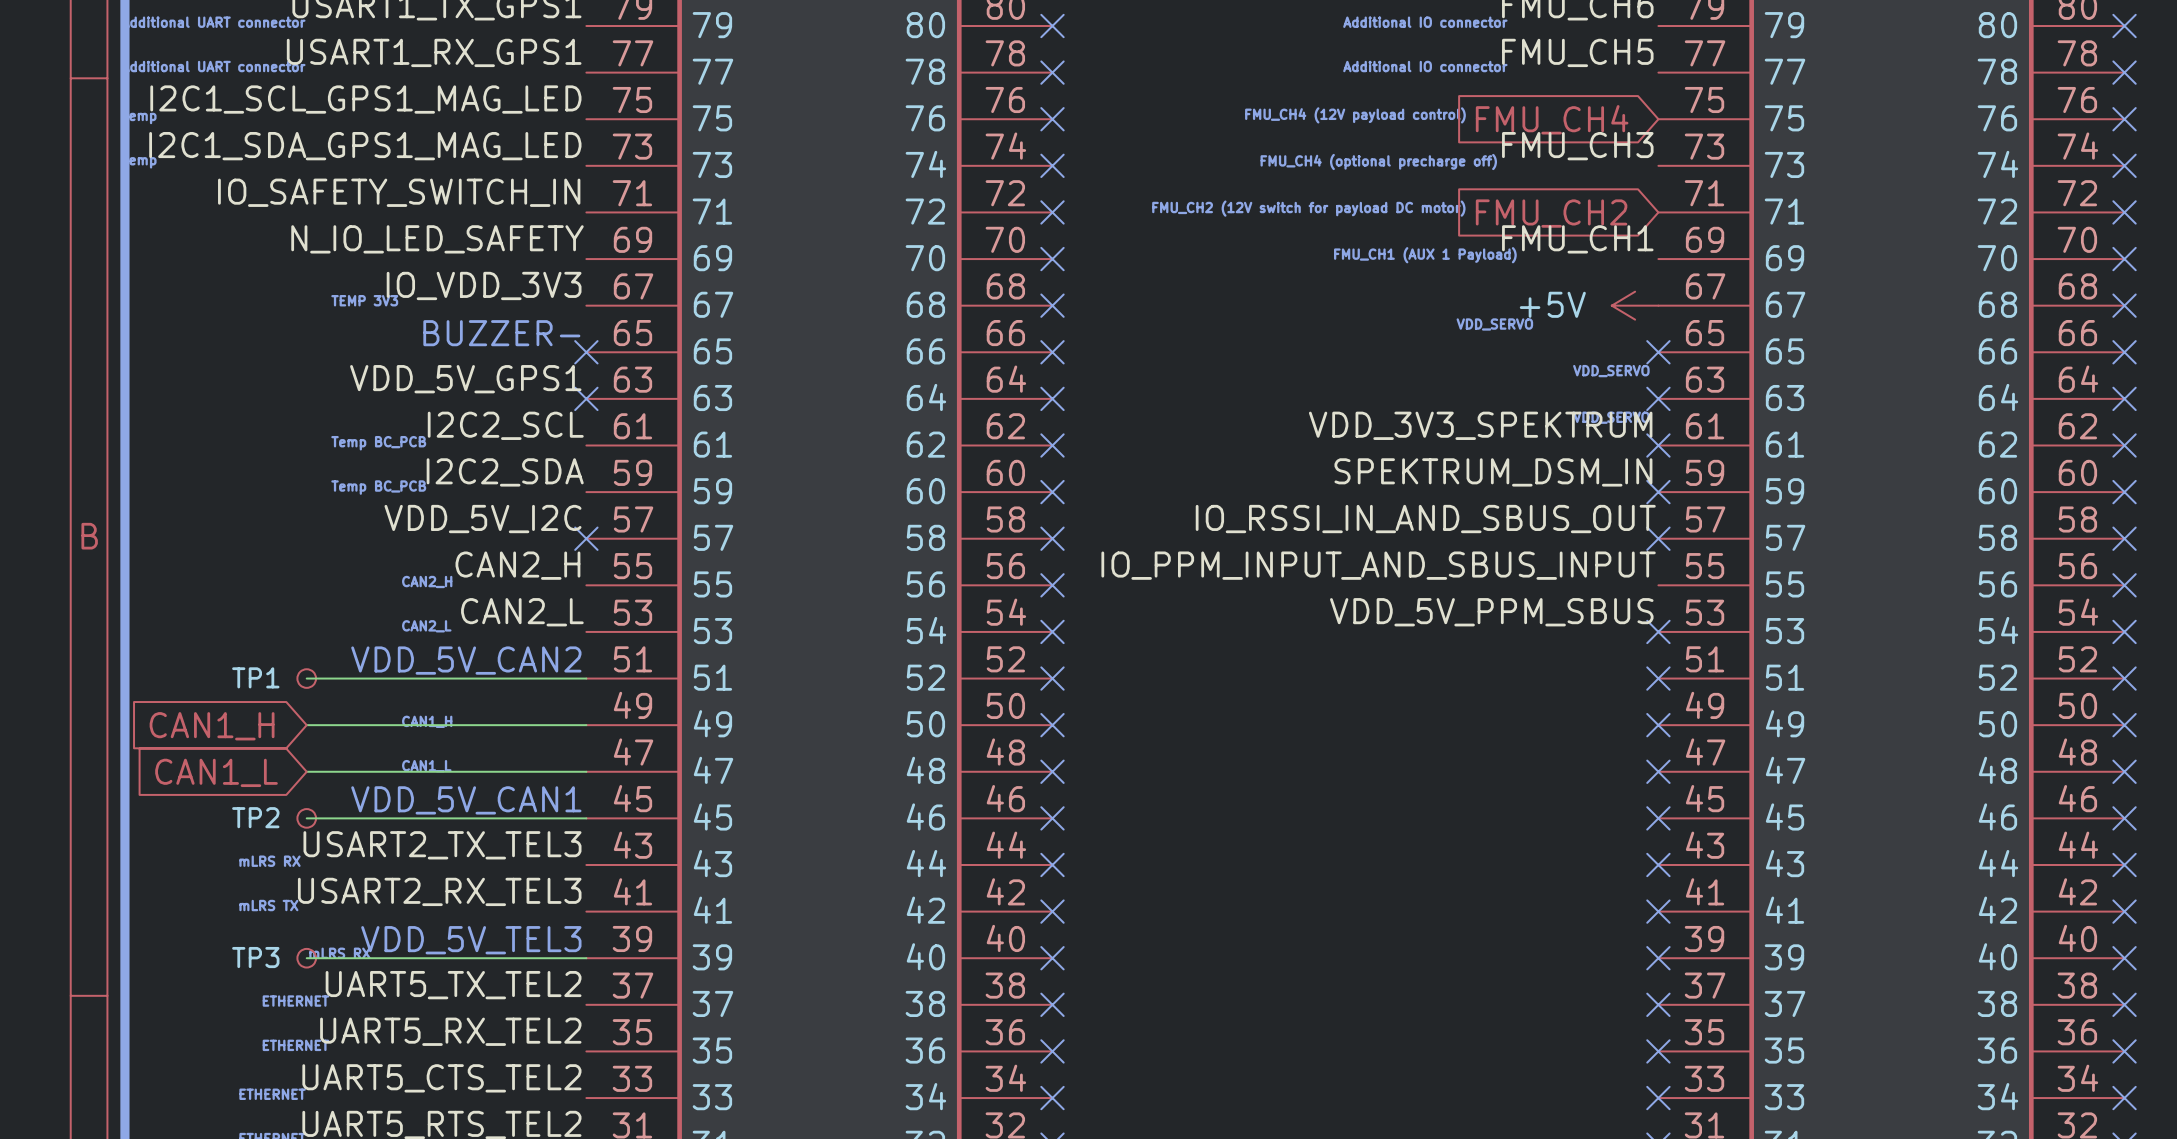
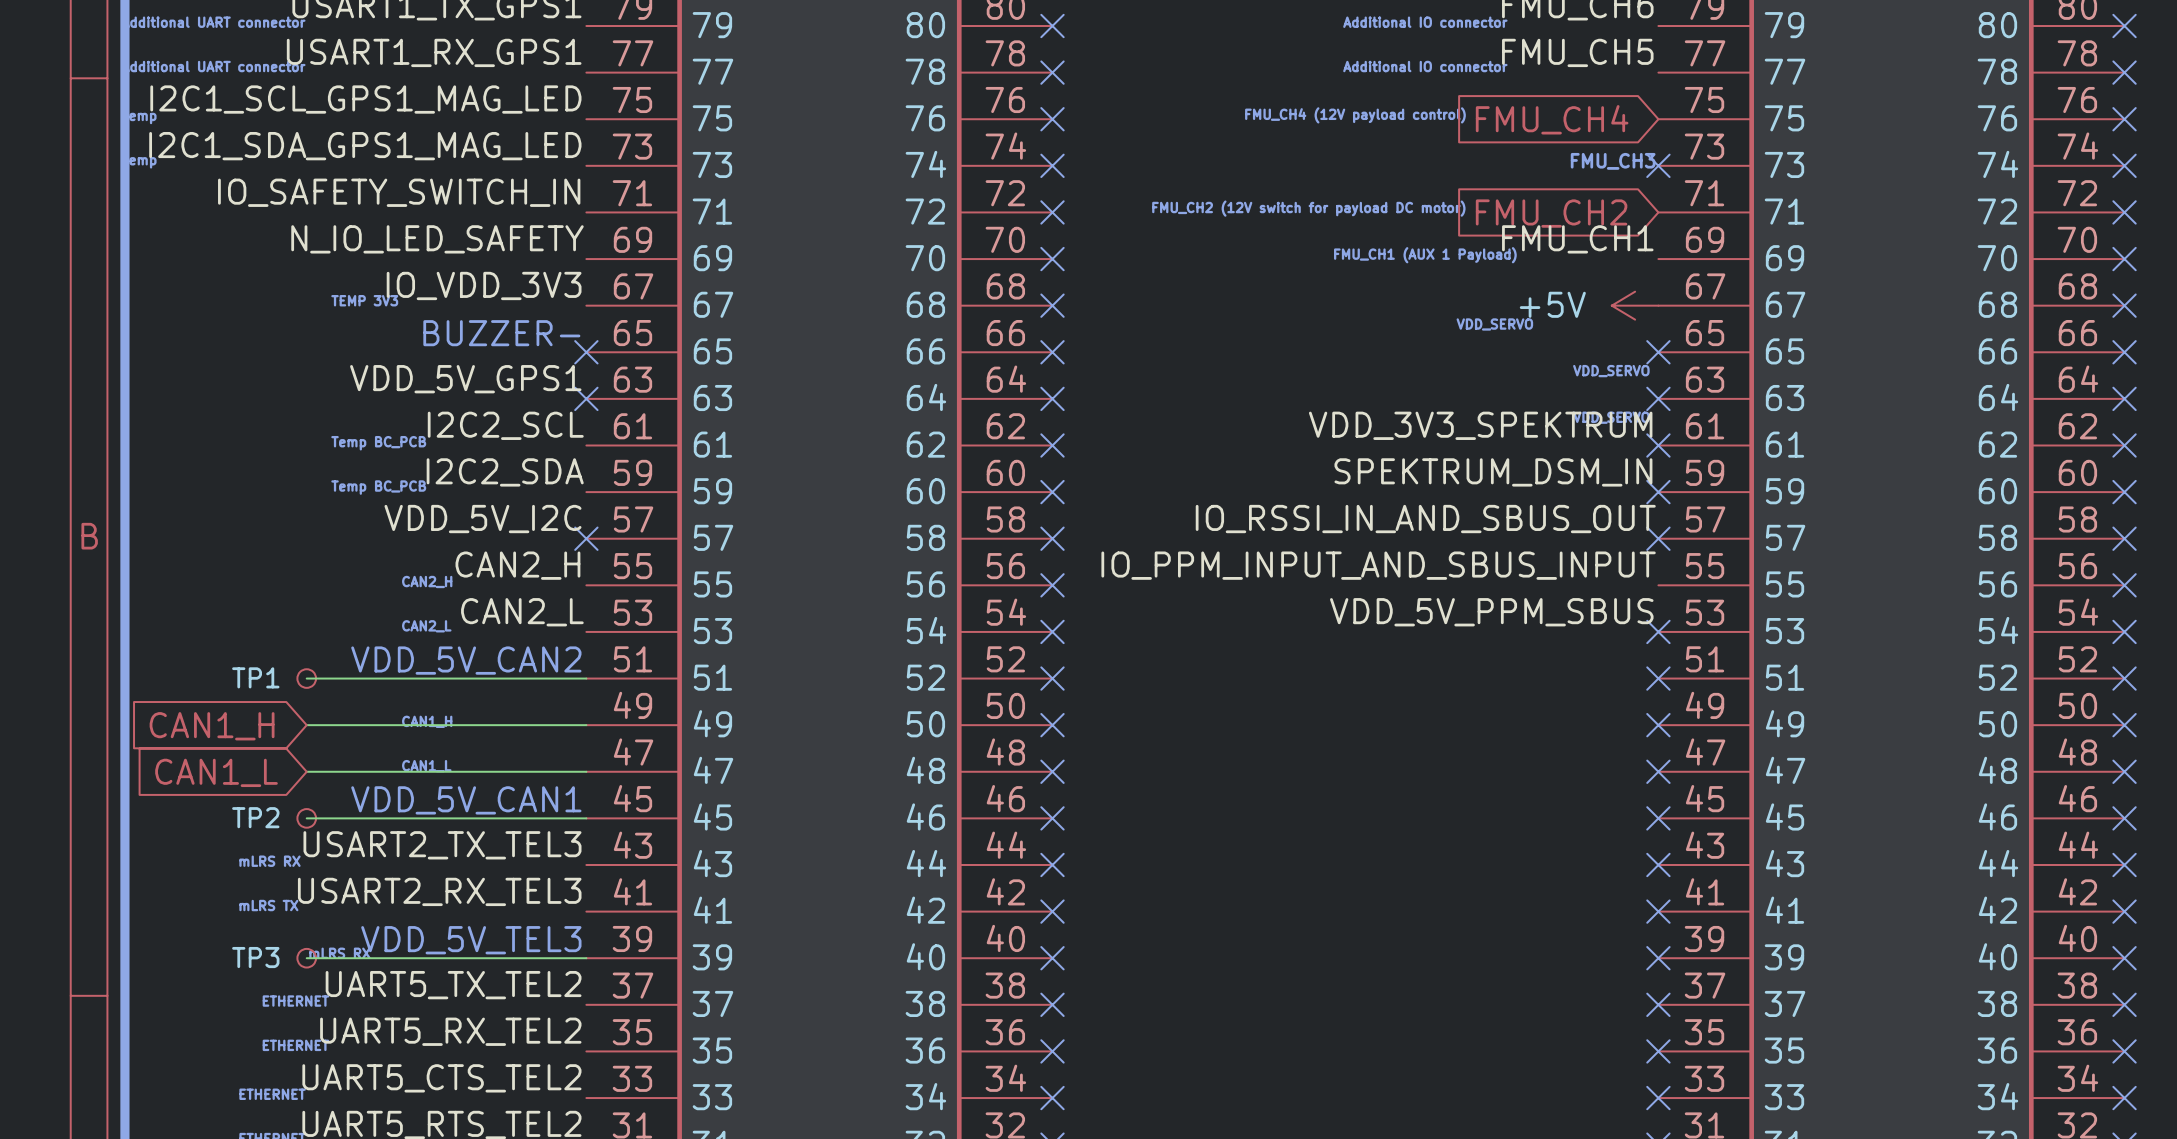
label: FMU_CH3 (1577, 146) -> none
text: FMU_CH4 (optional precharge off) (1378, 161) -> none
text: none -> FMU_CH3 (1613, 161)
no-connect mark: none -> (1658, 165)

